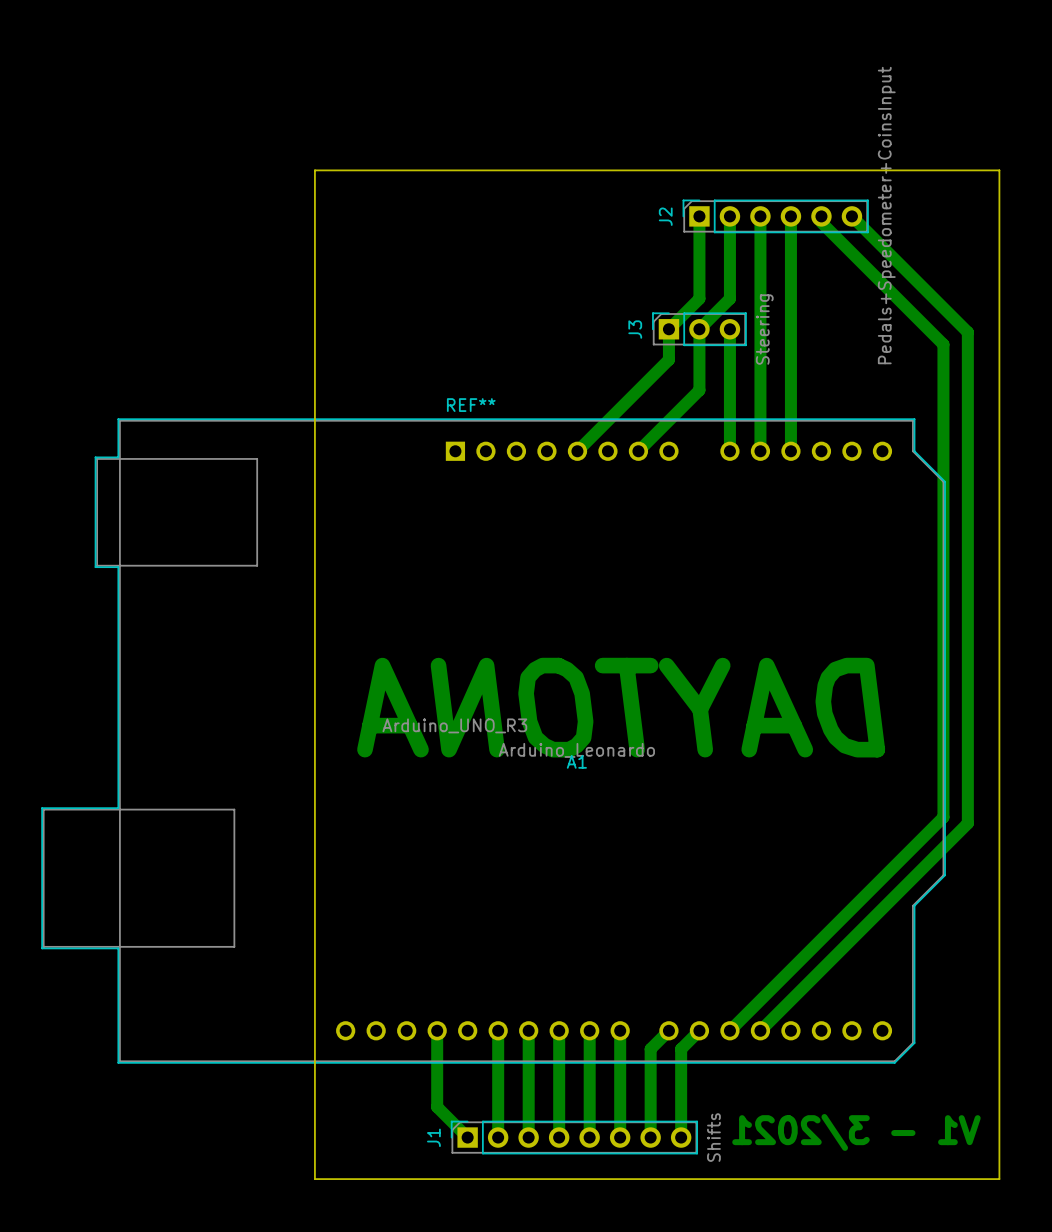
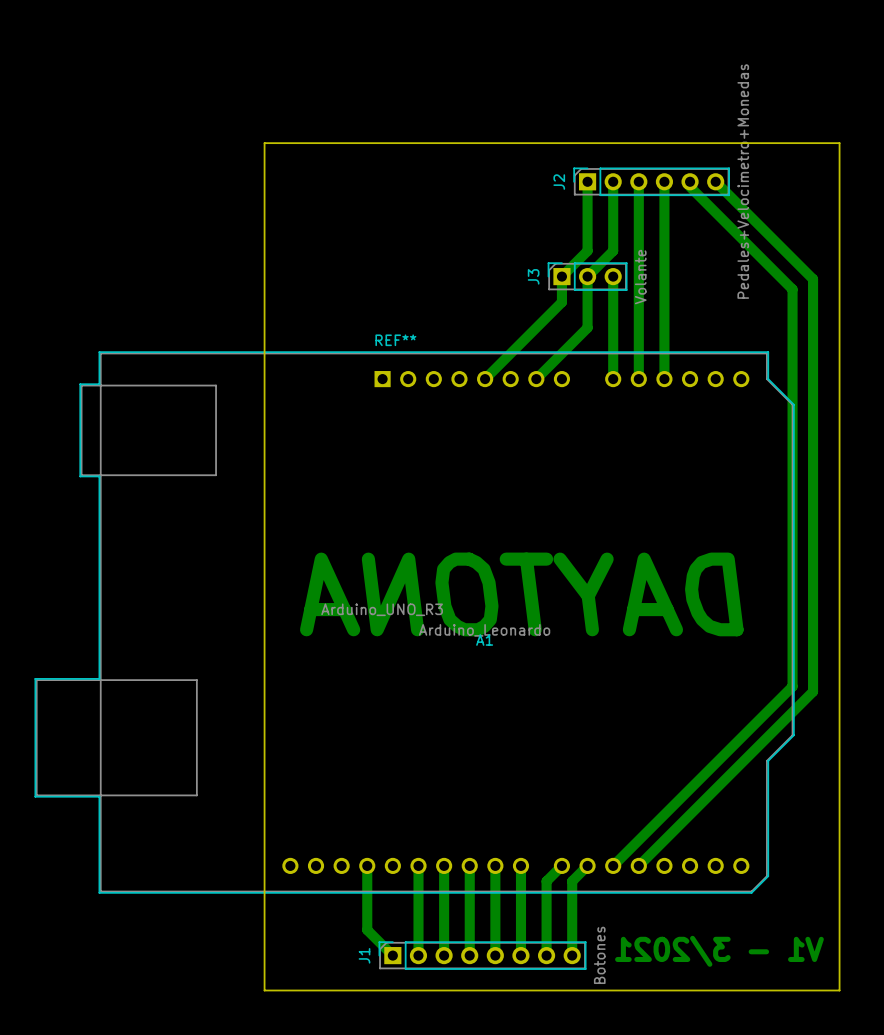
J2 value: Pedals+Speedometer+CoinsInput (886, 215) -> Pedales+Velocimetro+Monedas (743, 181)
J3 value: Steering (764, 329) -> Volante (640, 277)
J1 value: Shifts (713, 1137) -> Botones (599, 955)

